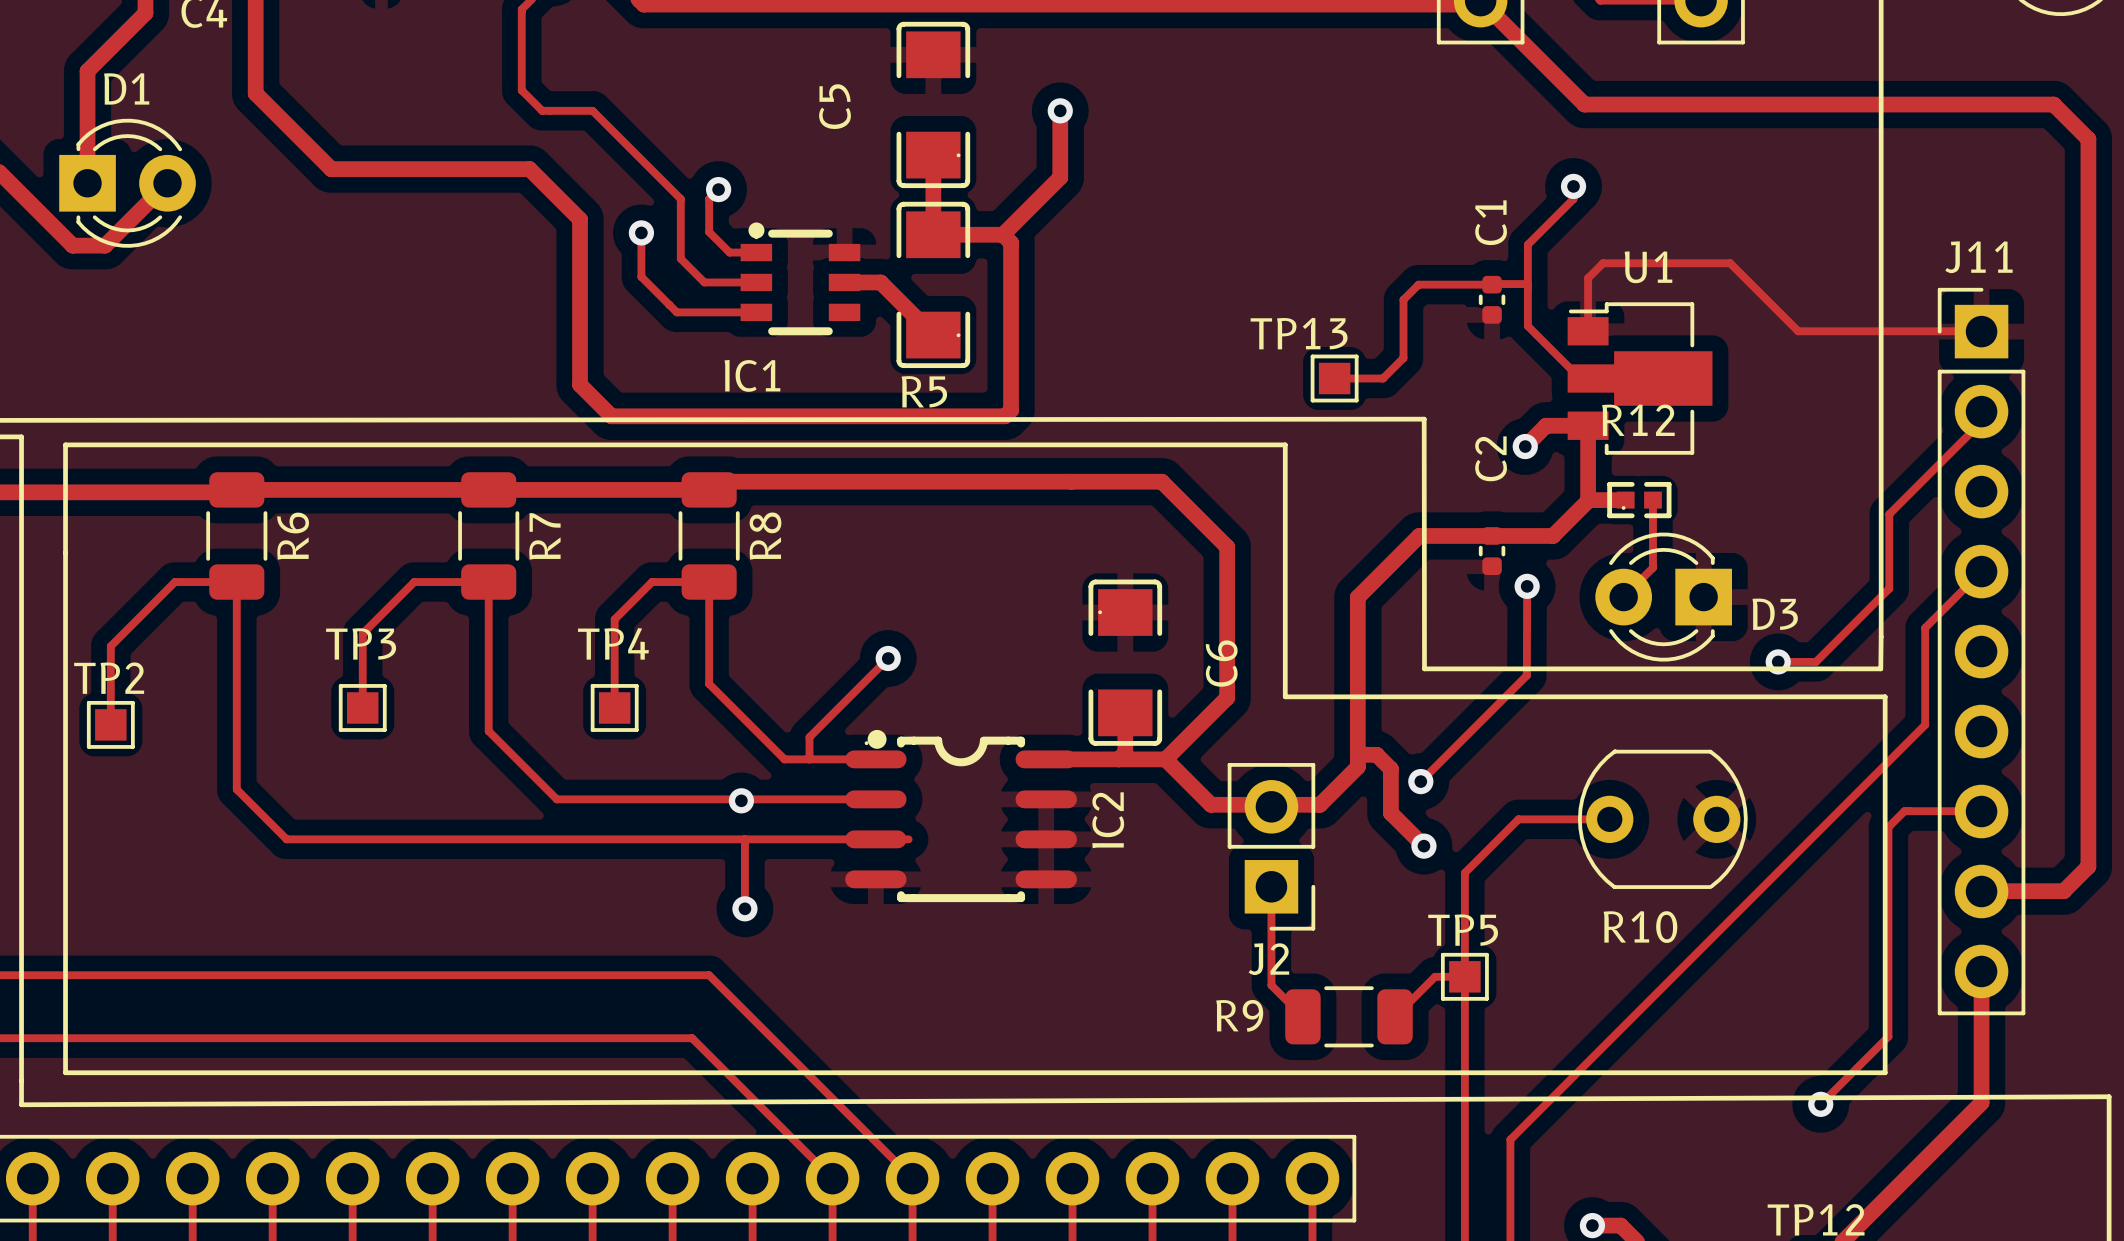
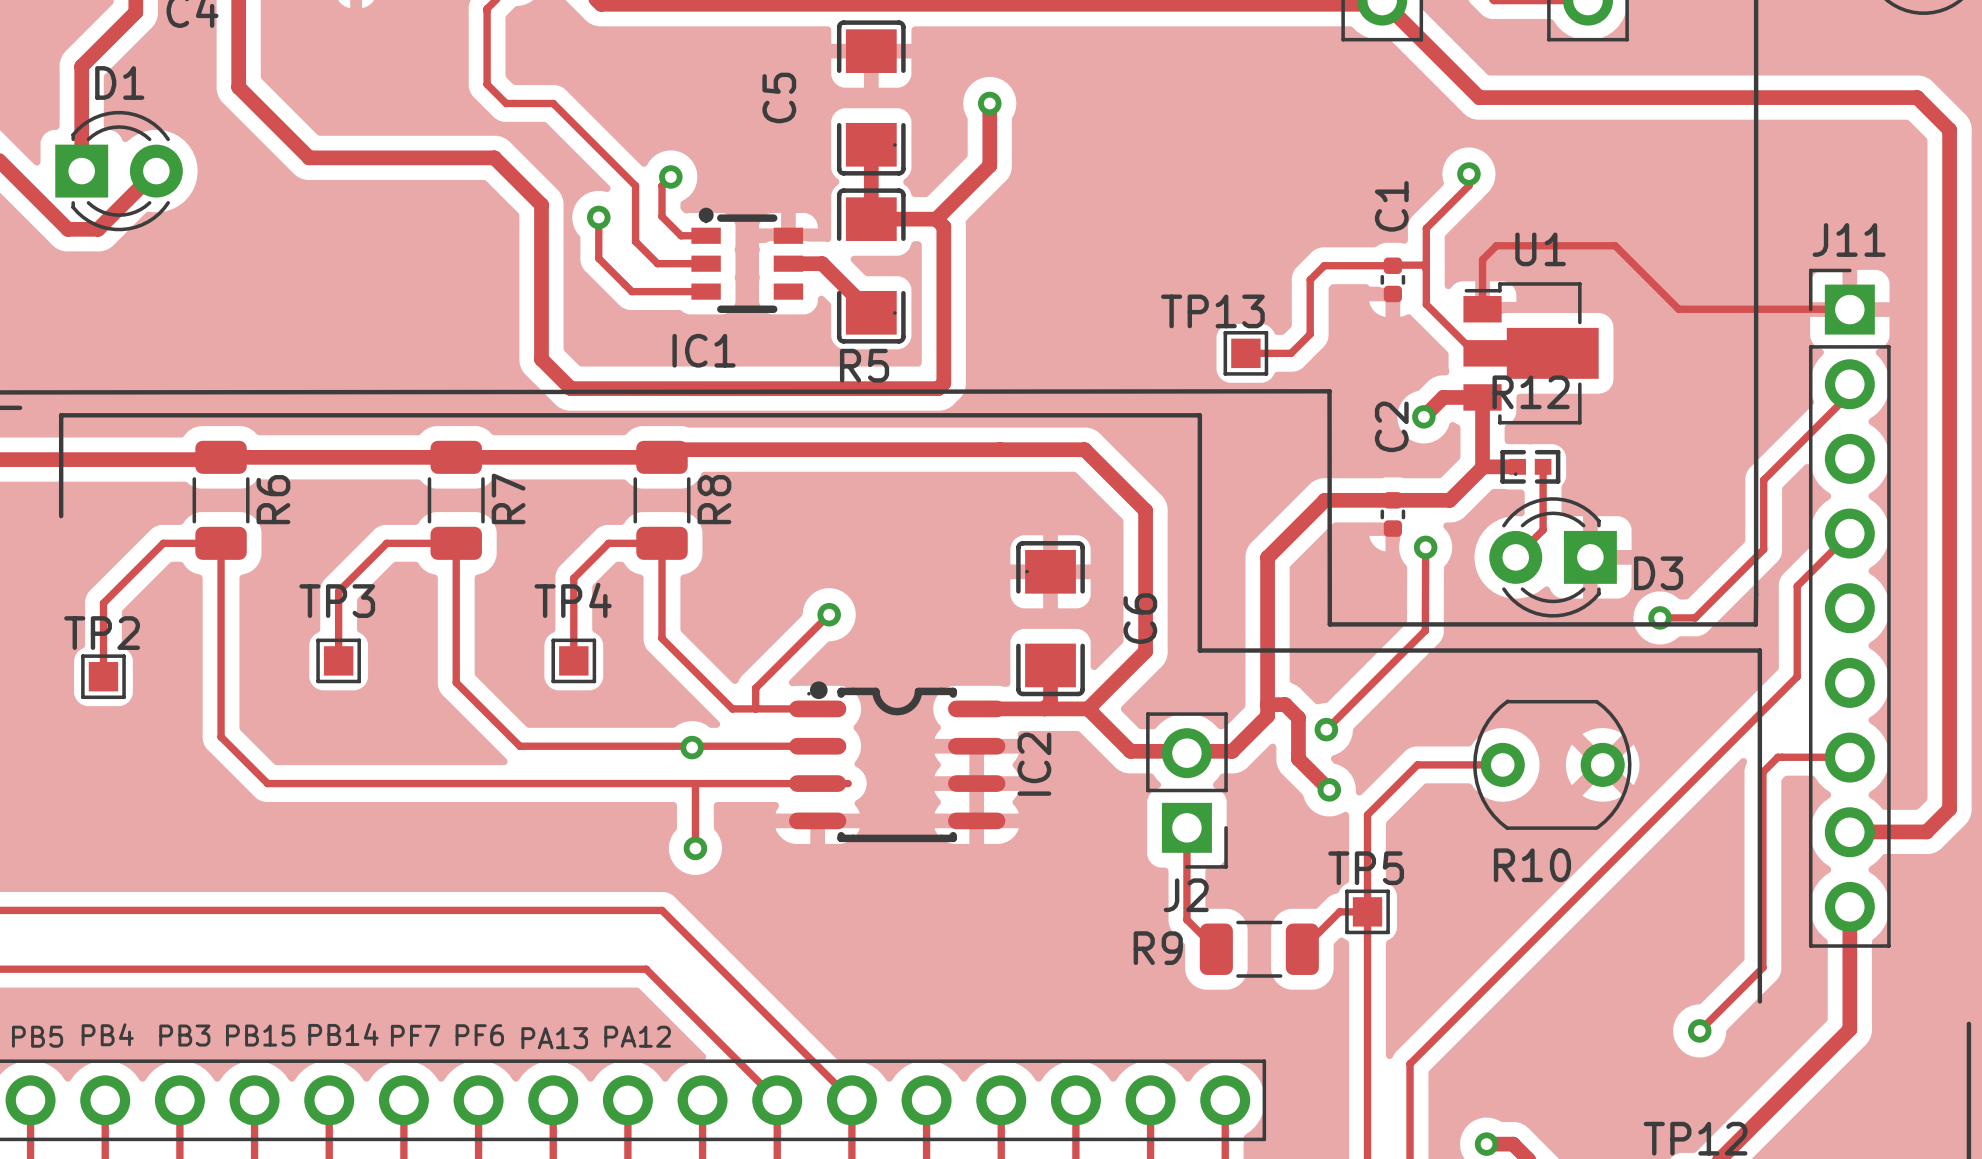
line: (21, 436) (21, 1104) (2109, 1096) -> none
line: (65, 552) (65, 1072) (1885, 1072) -> none
text: none -> PB4 (107, 1034)
text: none -> PB14 (343, 1034)
text: none -> PB3 (184, 1035)
text: none -> PB15 (260, 1035)
text: none -> PF7 (415, 1035)
text: none -> PF6 (479, 1035)
text: none -> PB5 (37, 1036)
text: none -> PA12 (637, 1036)
text: none -> PA13 (554, 1038)

